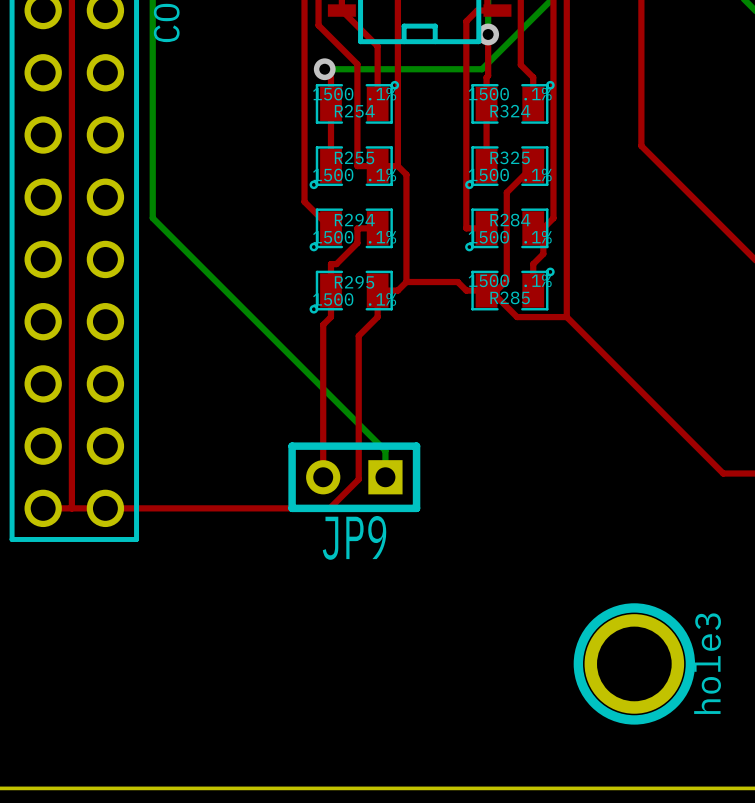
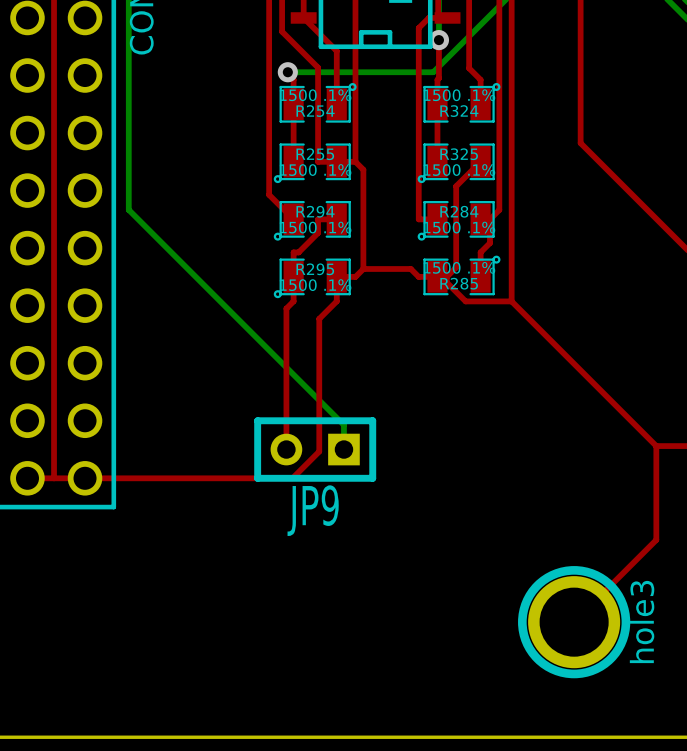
top track: (566, 317) (723, 473) -> (511, 301) (656, 446) (656, 539) (574, 622)

